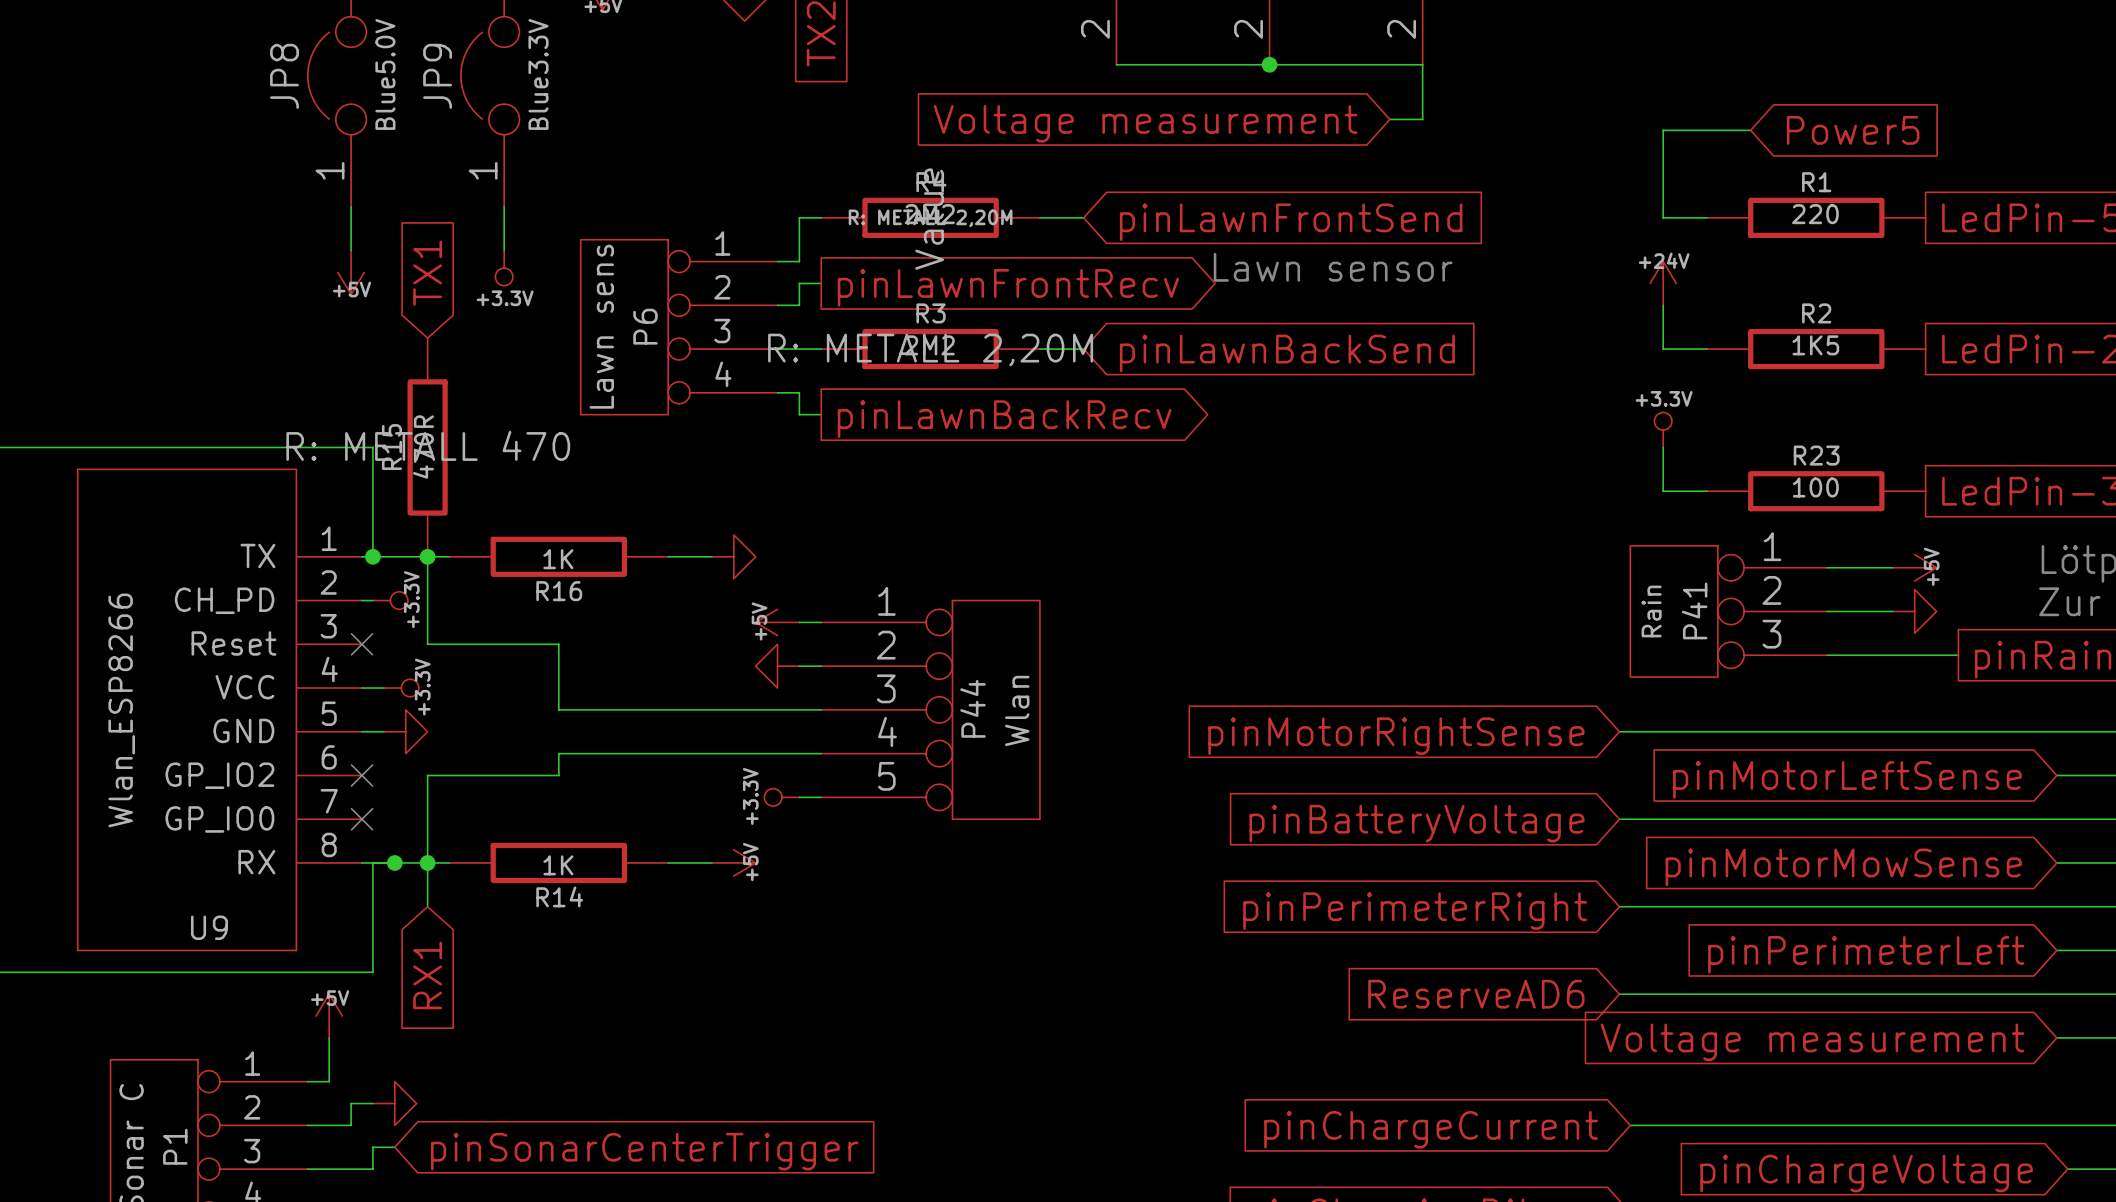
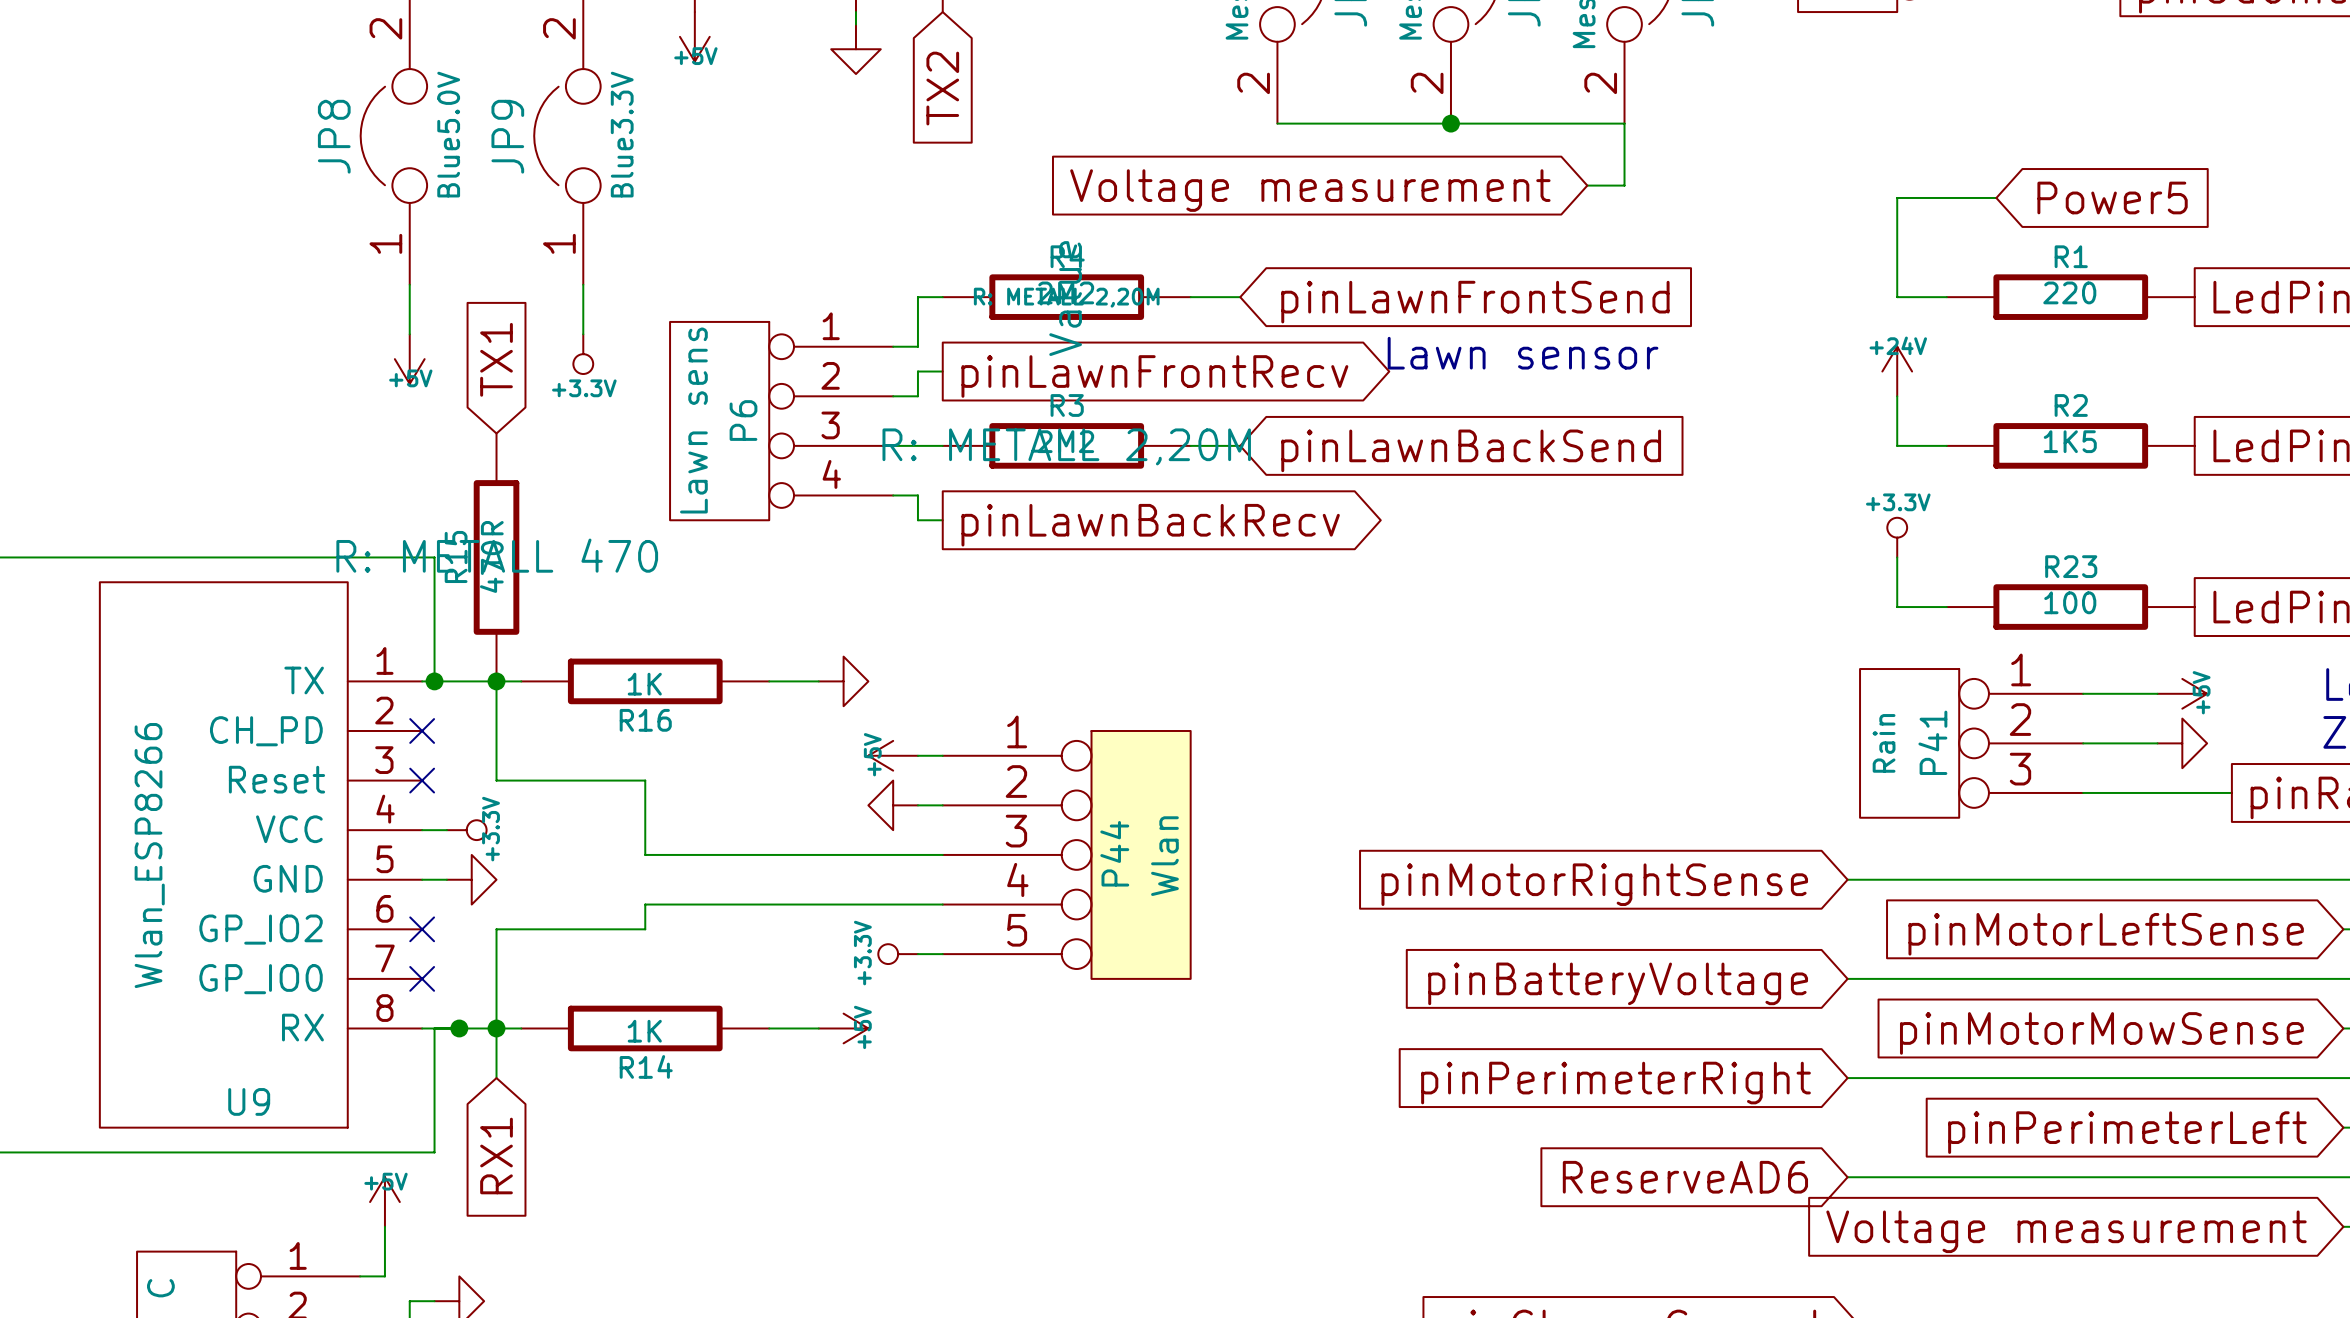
wire: (362, 600) (372, 600) -> none
no-connect mark: none -> (422, 730)
power symbol: +3.3V (390, 600) -> none

